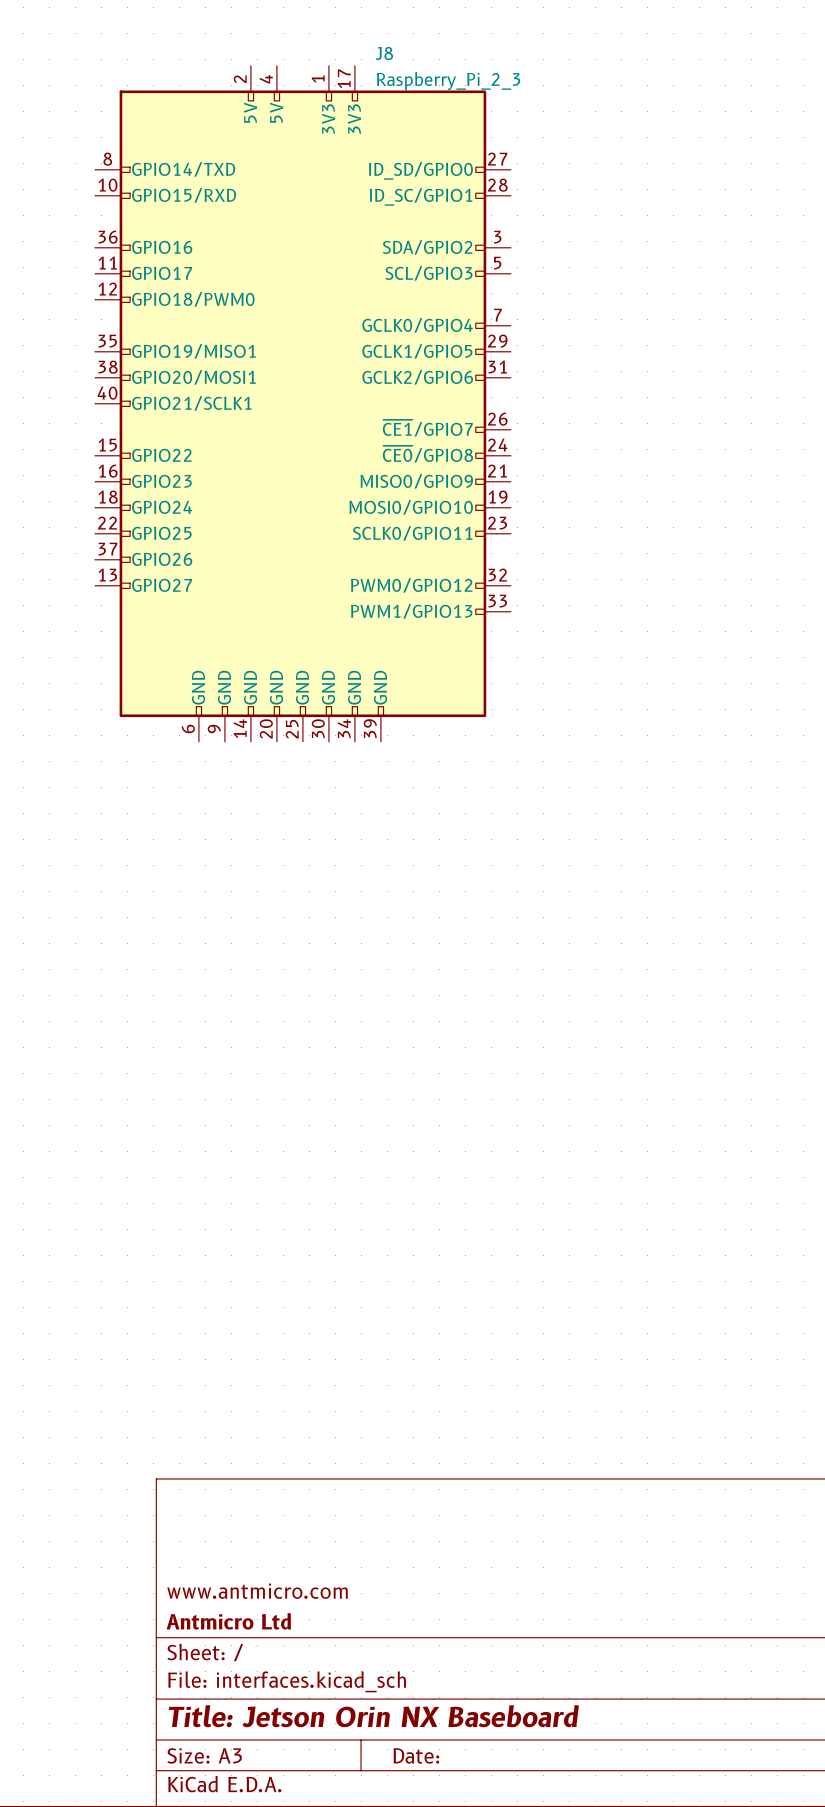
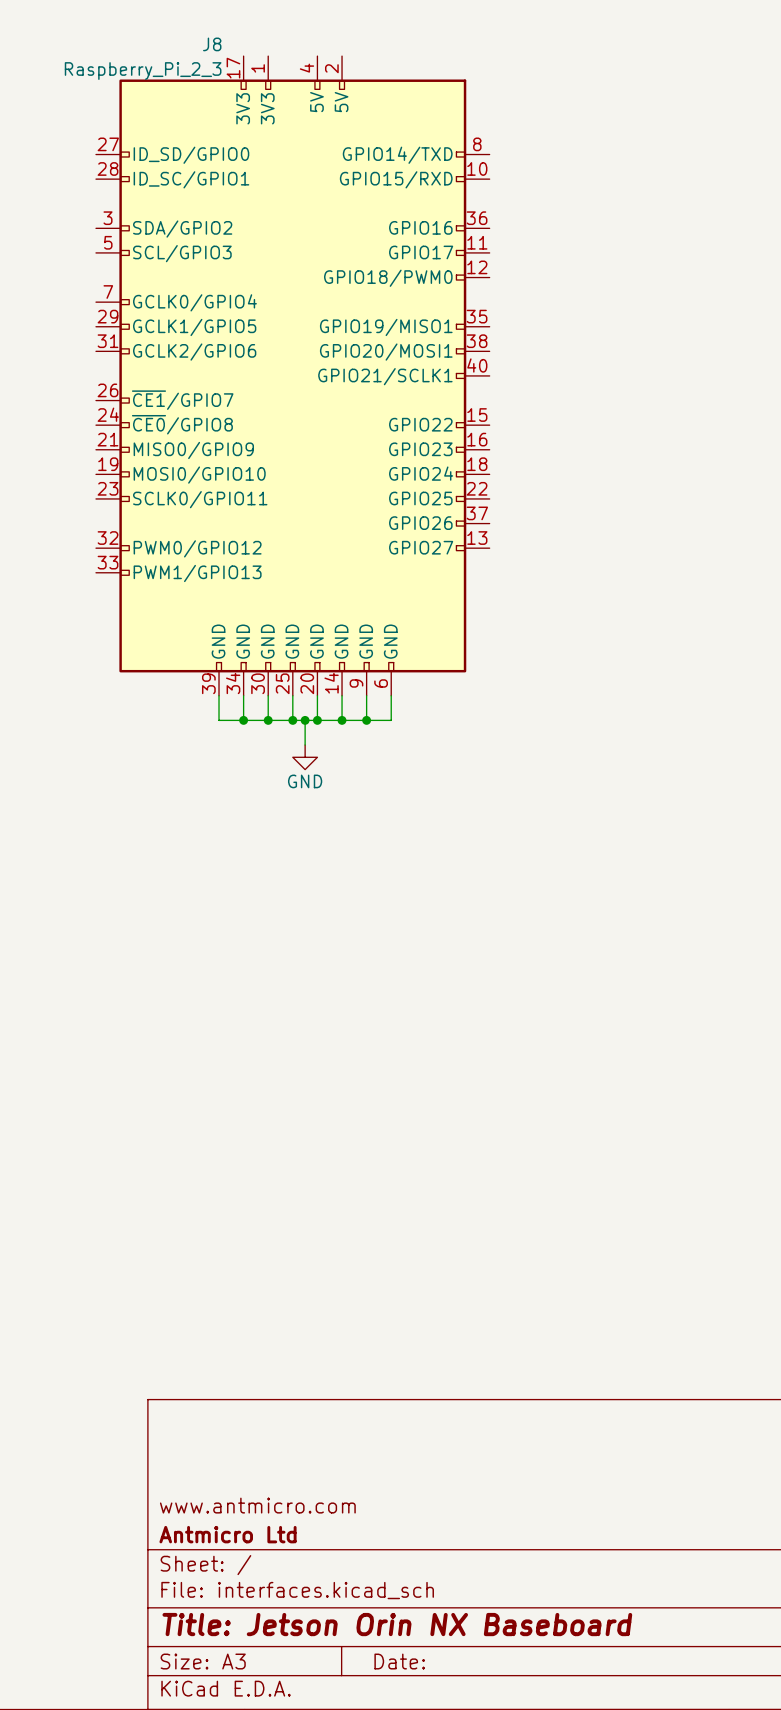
J8 flip: as is (302, 403) -> left-right (292, 375)
wire: none -> (219, 695) (219, 720) (391, 720) (391, 695)
wire: none -> (243, 695) (243, 720)
wire: none -> (268, 695) (268, 720)
wire: none -> (292, 695) (292, 720)
wire: none -> (317, 695) (317, 720)
wire: none -> (342, 695) (342, 720)
wire: none -> (366, 695) (366, 720)
junction: none -> (243, 720)
junction: none -> (268, 720)
junction: none -> (292, 720)
wire: none -> (305, 720) (305, 744)
junction: none -> (305, 720)
junction: none -> (317, 720)
junction: none -> (342, 720)
junction: none -> (366, 720)
power symbol: none -> GND (305, 757)

